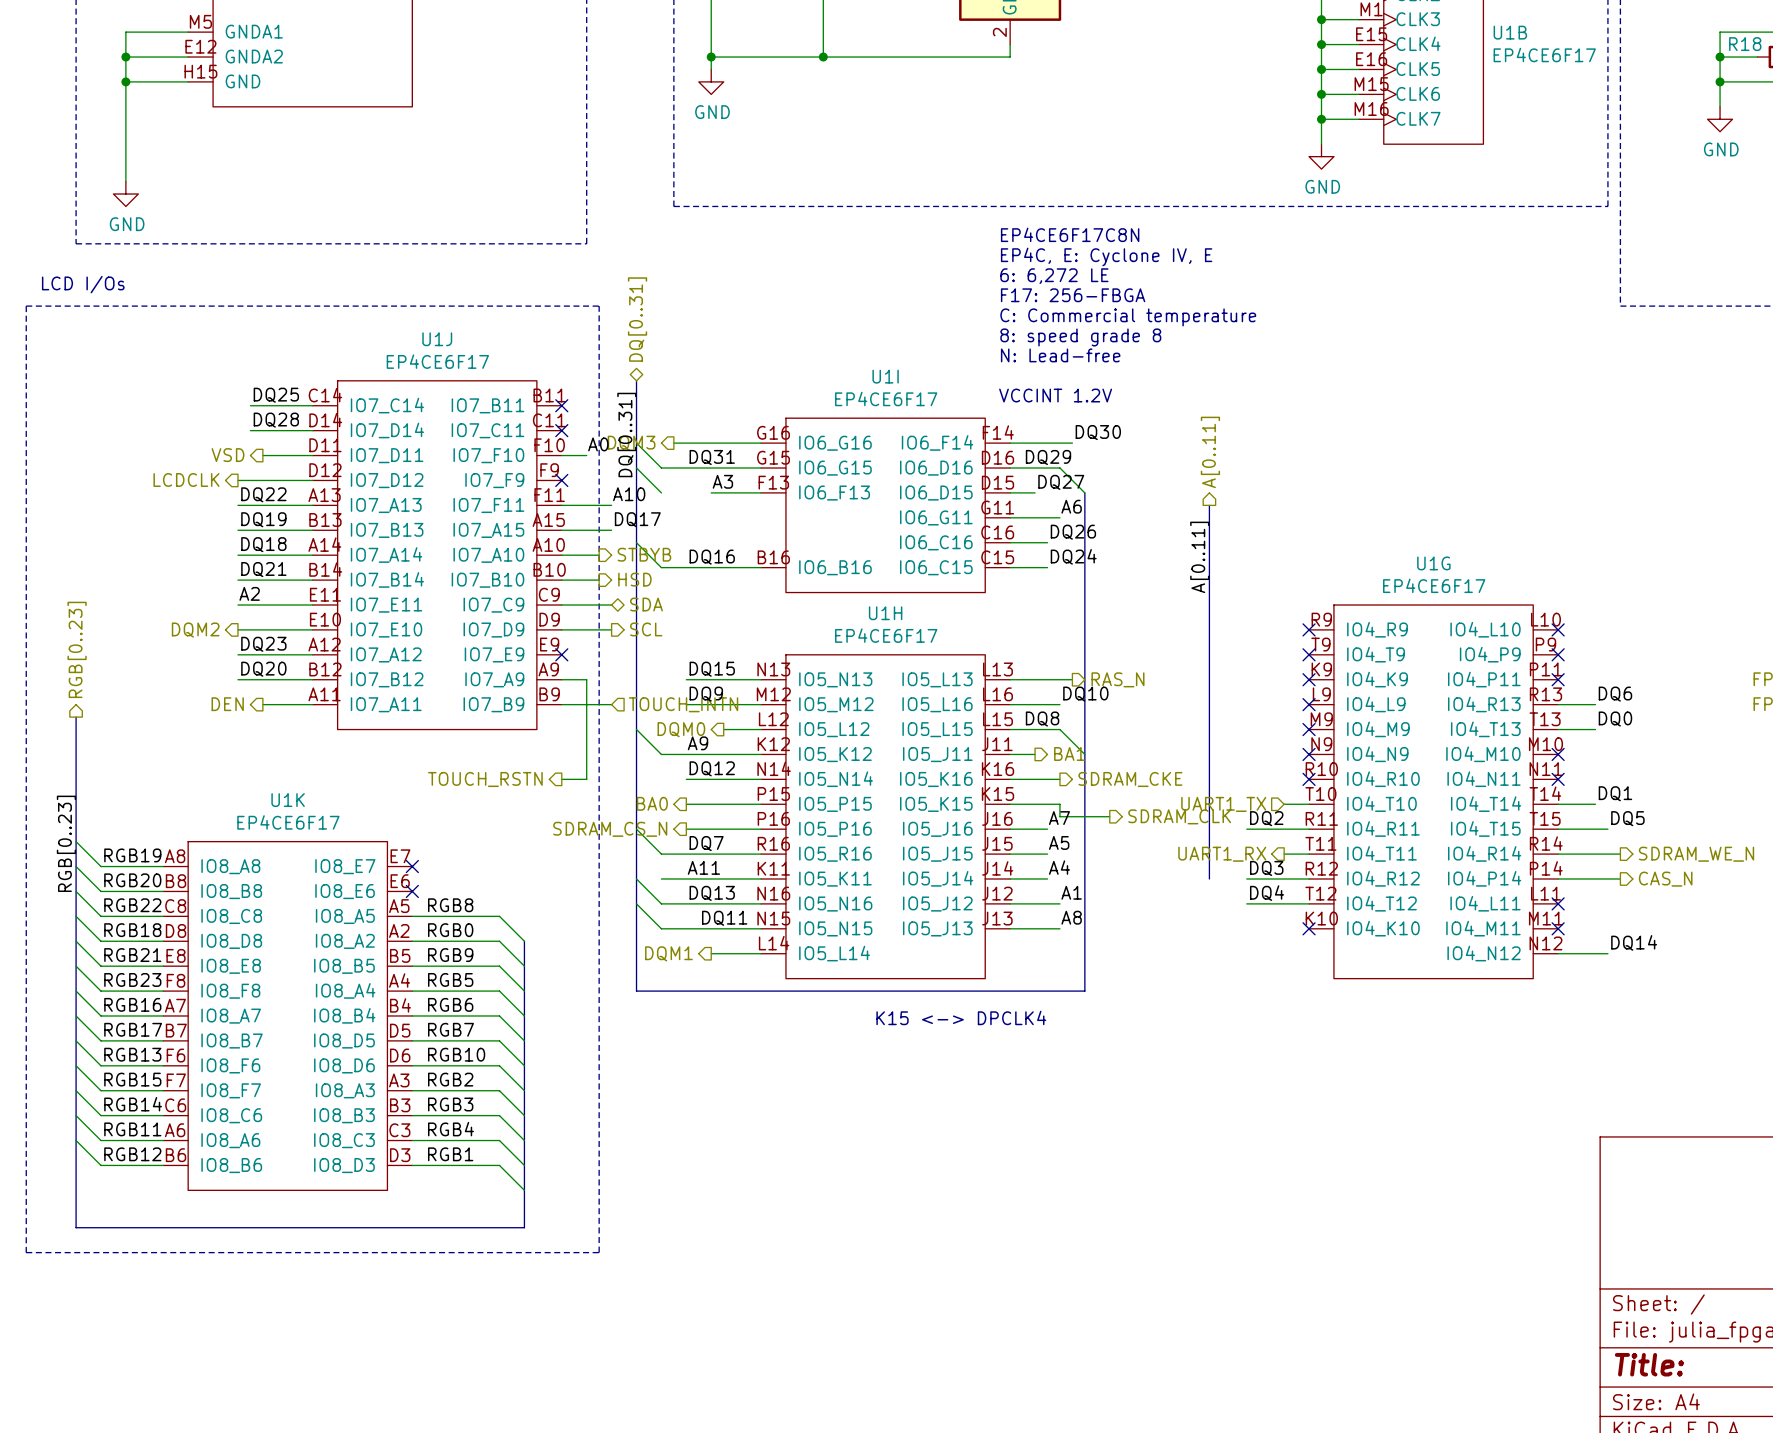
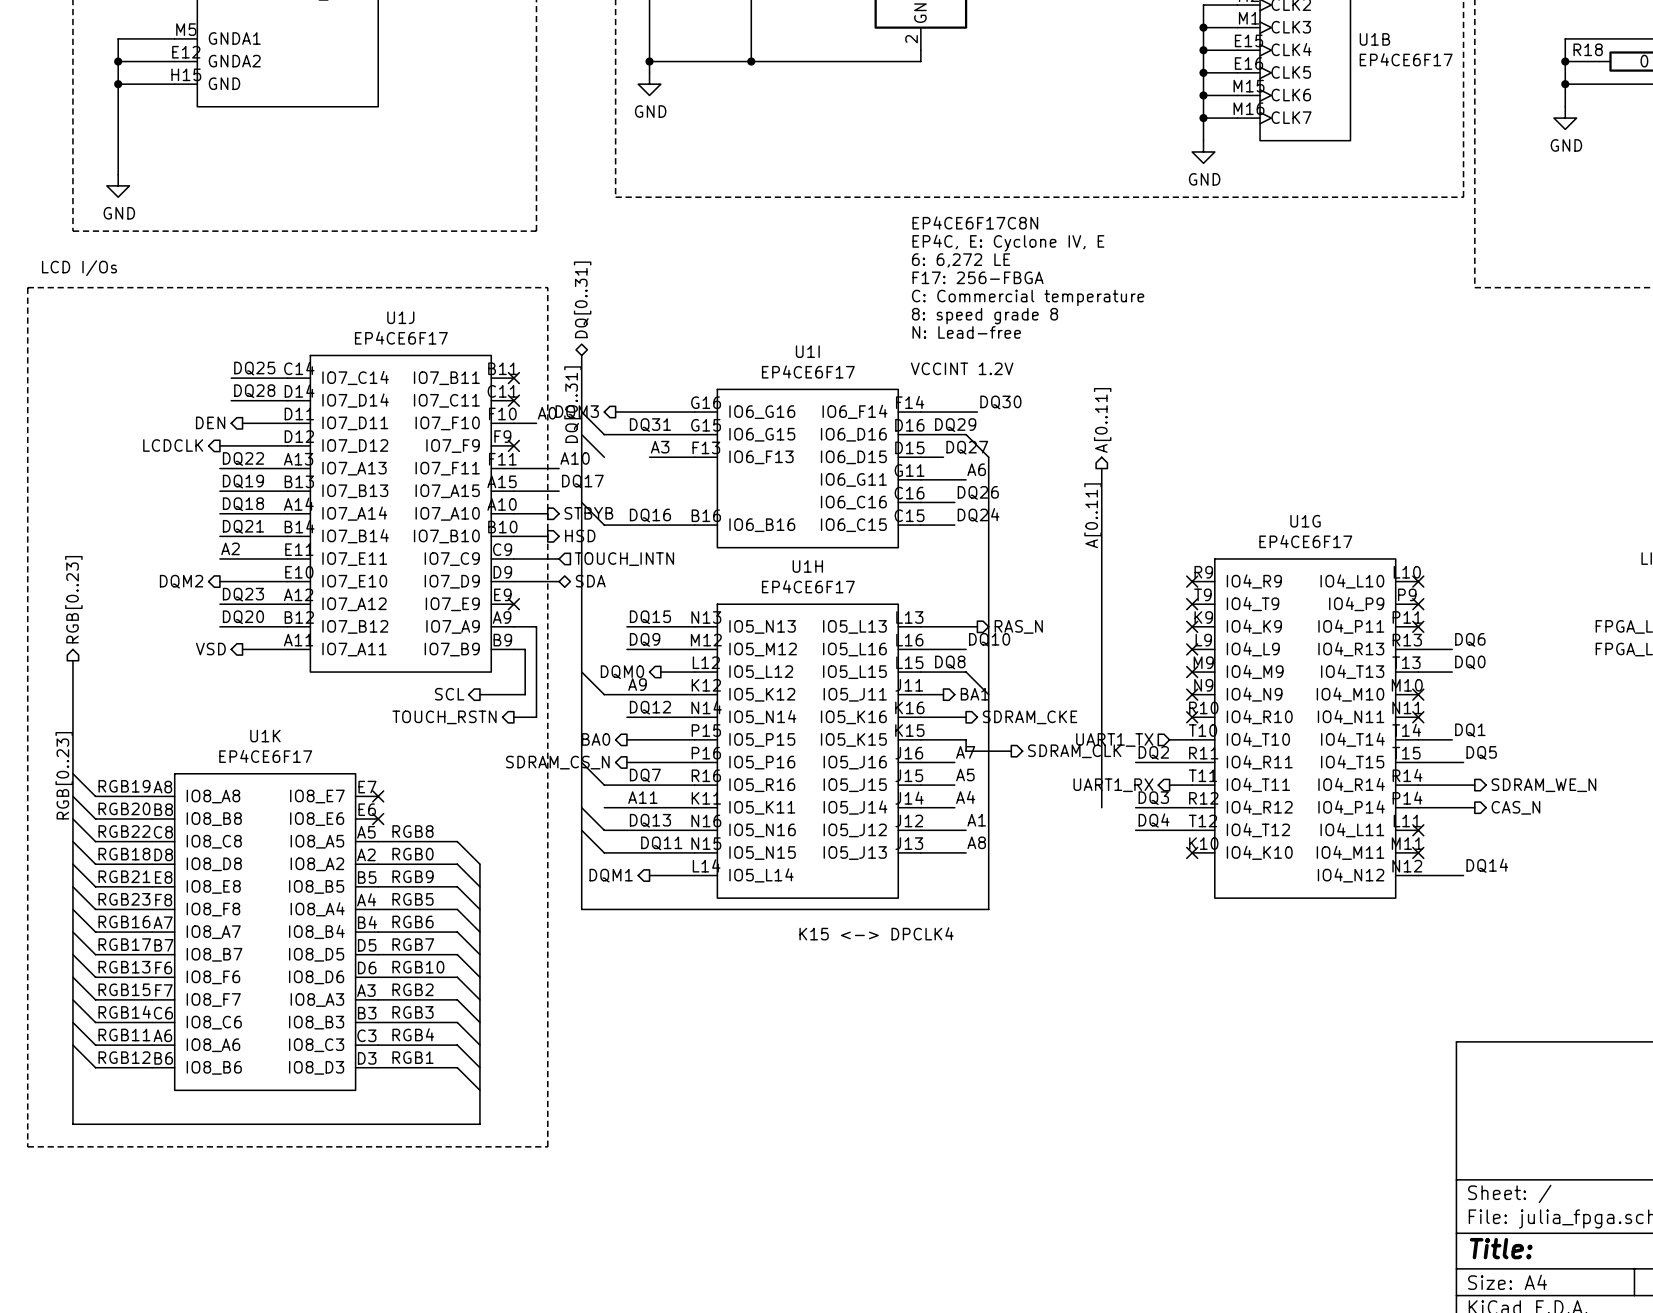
hierarchical label: VSD (228, 455) -> DEN (210, 422)
hierarchical label shape: bidirectional (646, 604) -> input (624, 559)
hierarchical label: SDA (646, 604) -> TOUCH_INTN (624, 559)
hierarchical label shape: output (646, 629) -> bidirectional (590, 581)
hierarchical label: SCL (646, 629) -> SDA (590, 581)
hierarchical label: DEN (227, 704) -> VSD (210, 649)
wire: (574, 704) (611, 704) -> (525, 649) (525, 694) (479, 694)
hierarchical label: TOUCH_INTN (683, 704) -> none
hierarchical label: none -> SCL (449, 694)

